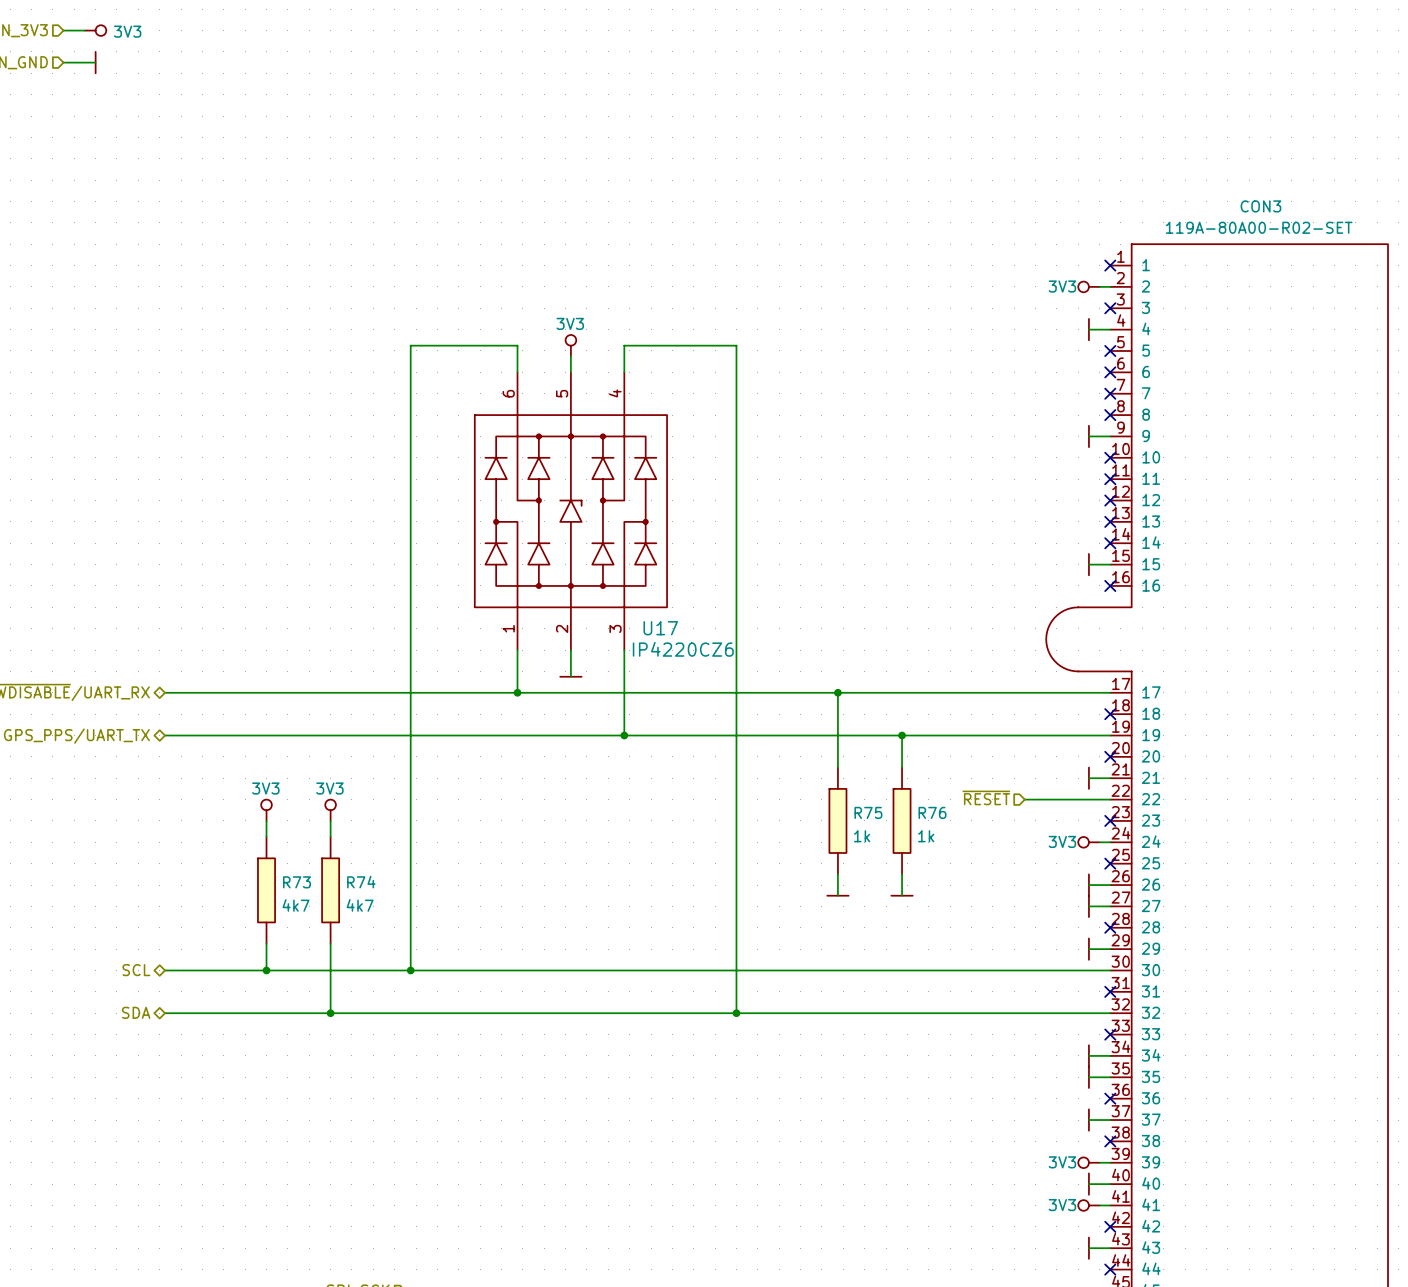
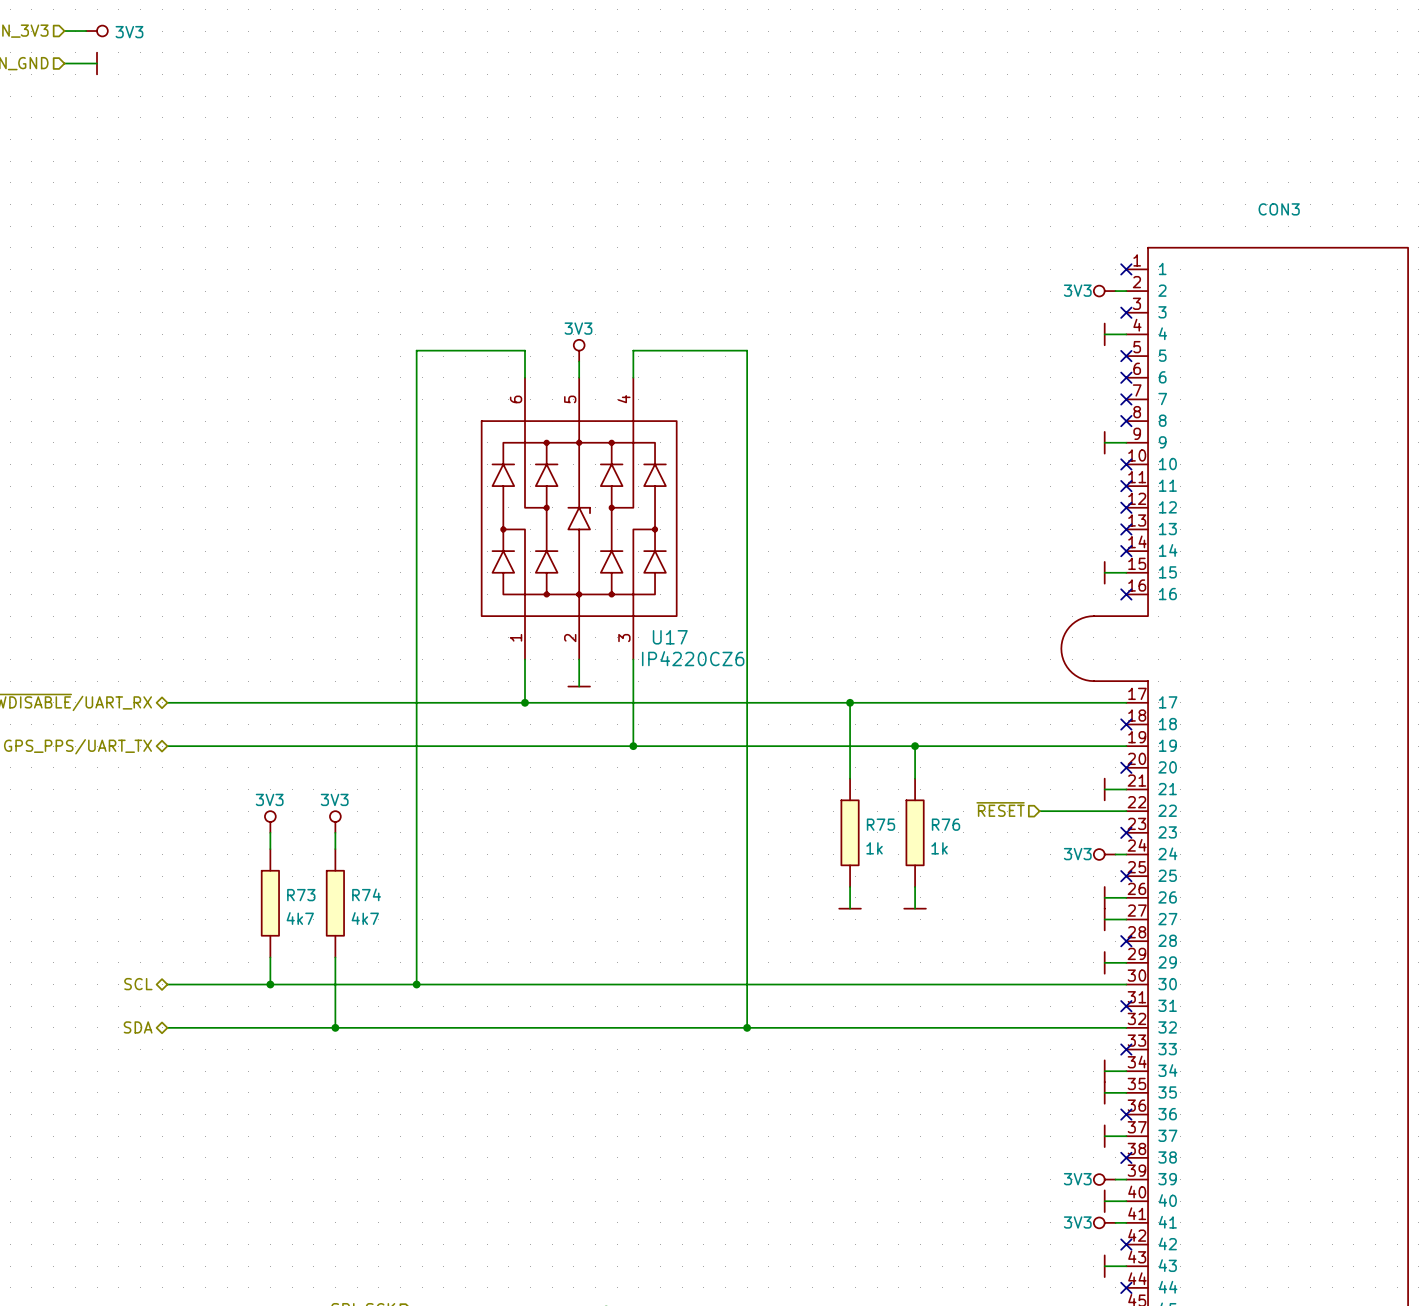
CON3 value: 119A-80A00-R02-SET (1259, 227) -> none

